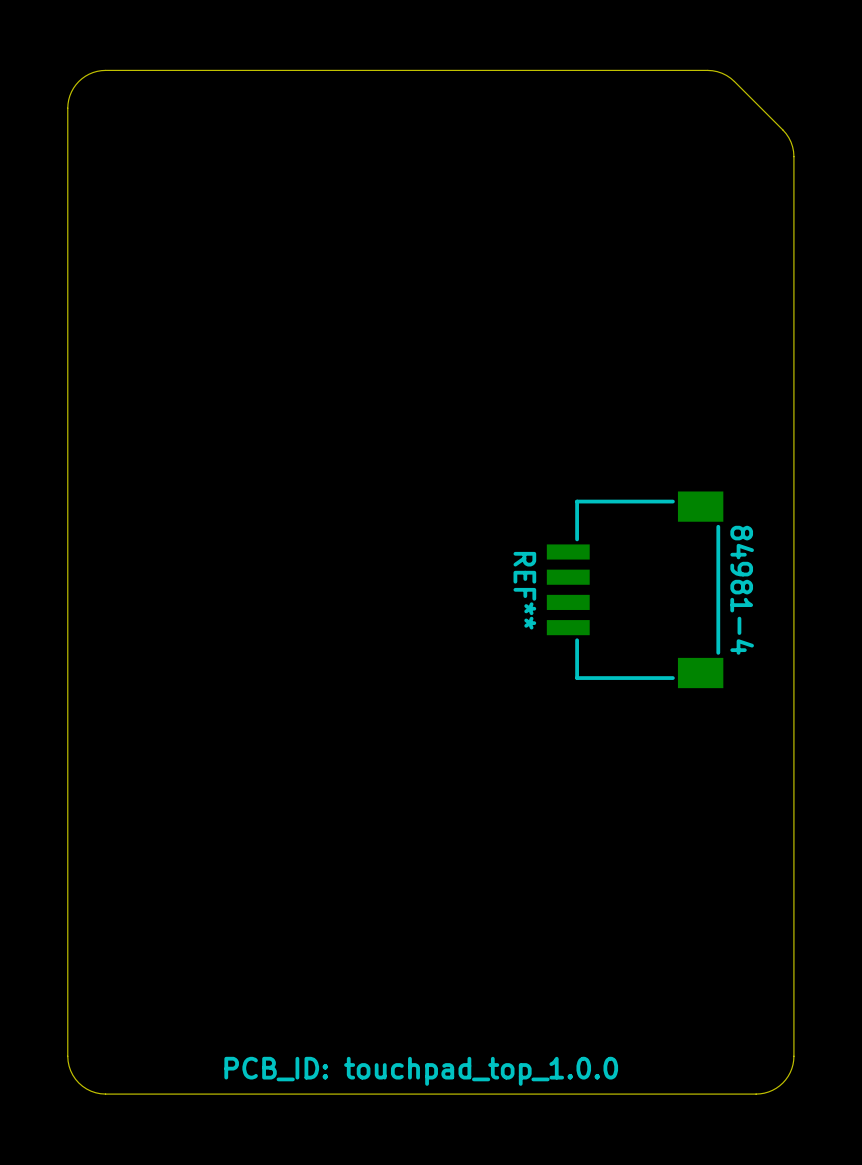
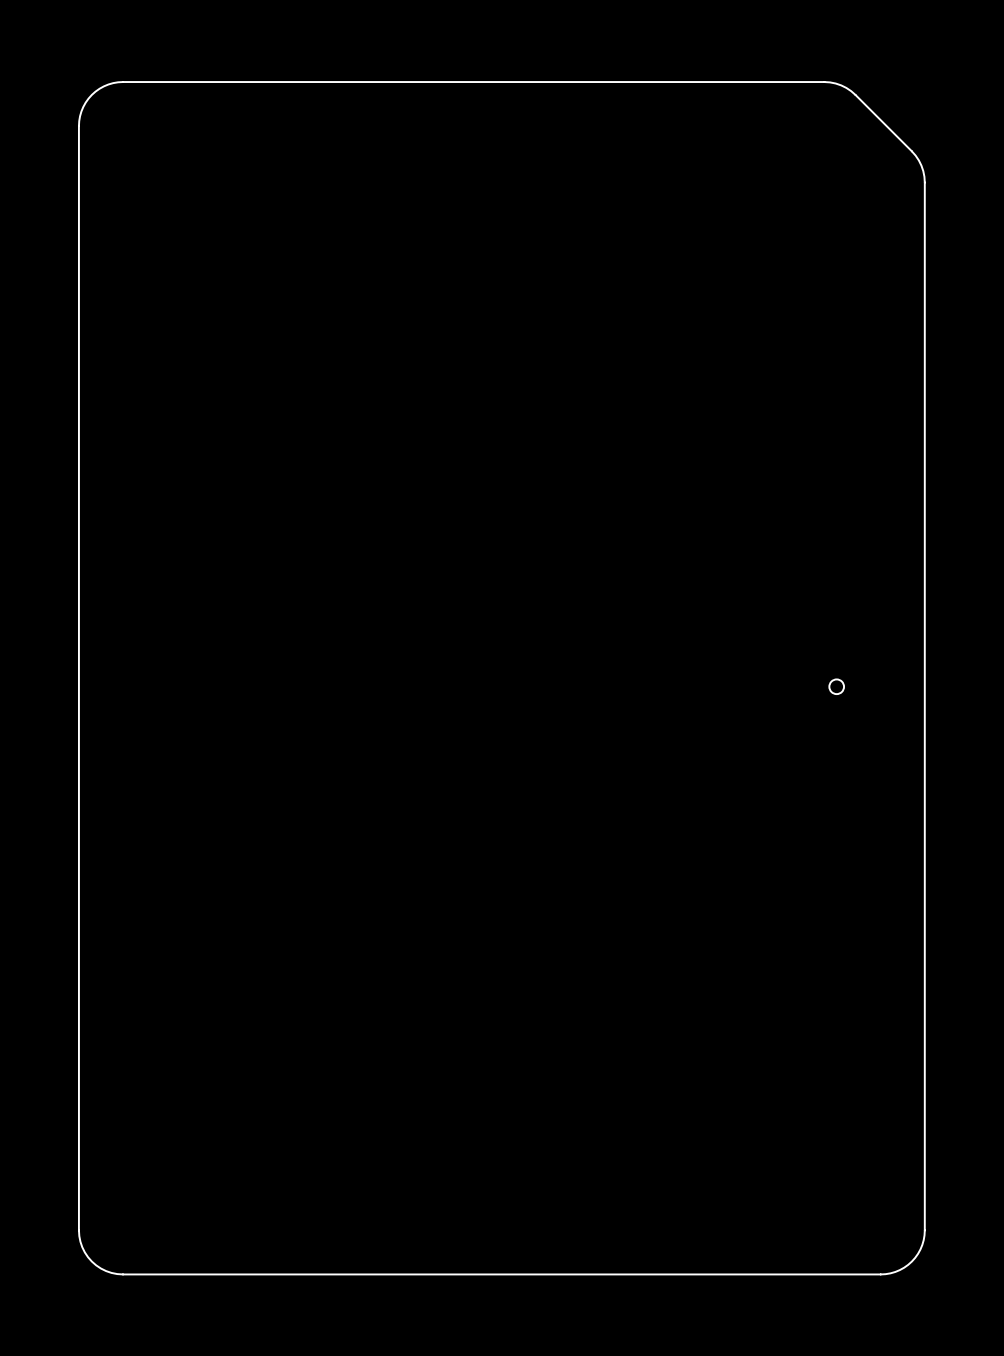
round board edge: none -> [829, 679, 845, 695]
REF**: 84981-4 (635, 589) -> none
text: PCB_ID: touchpad_top_1.0.0 (421, 1071) -> none

